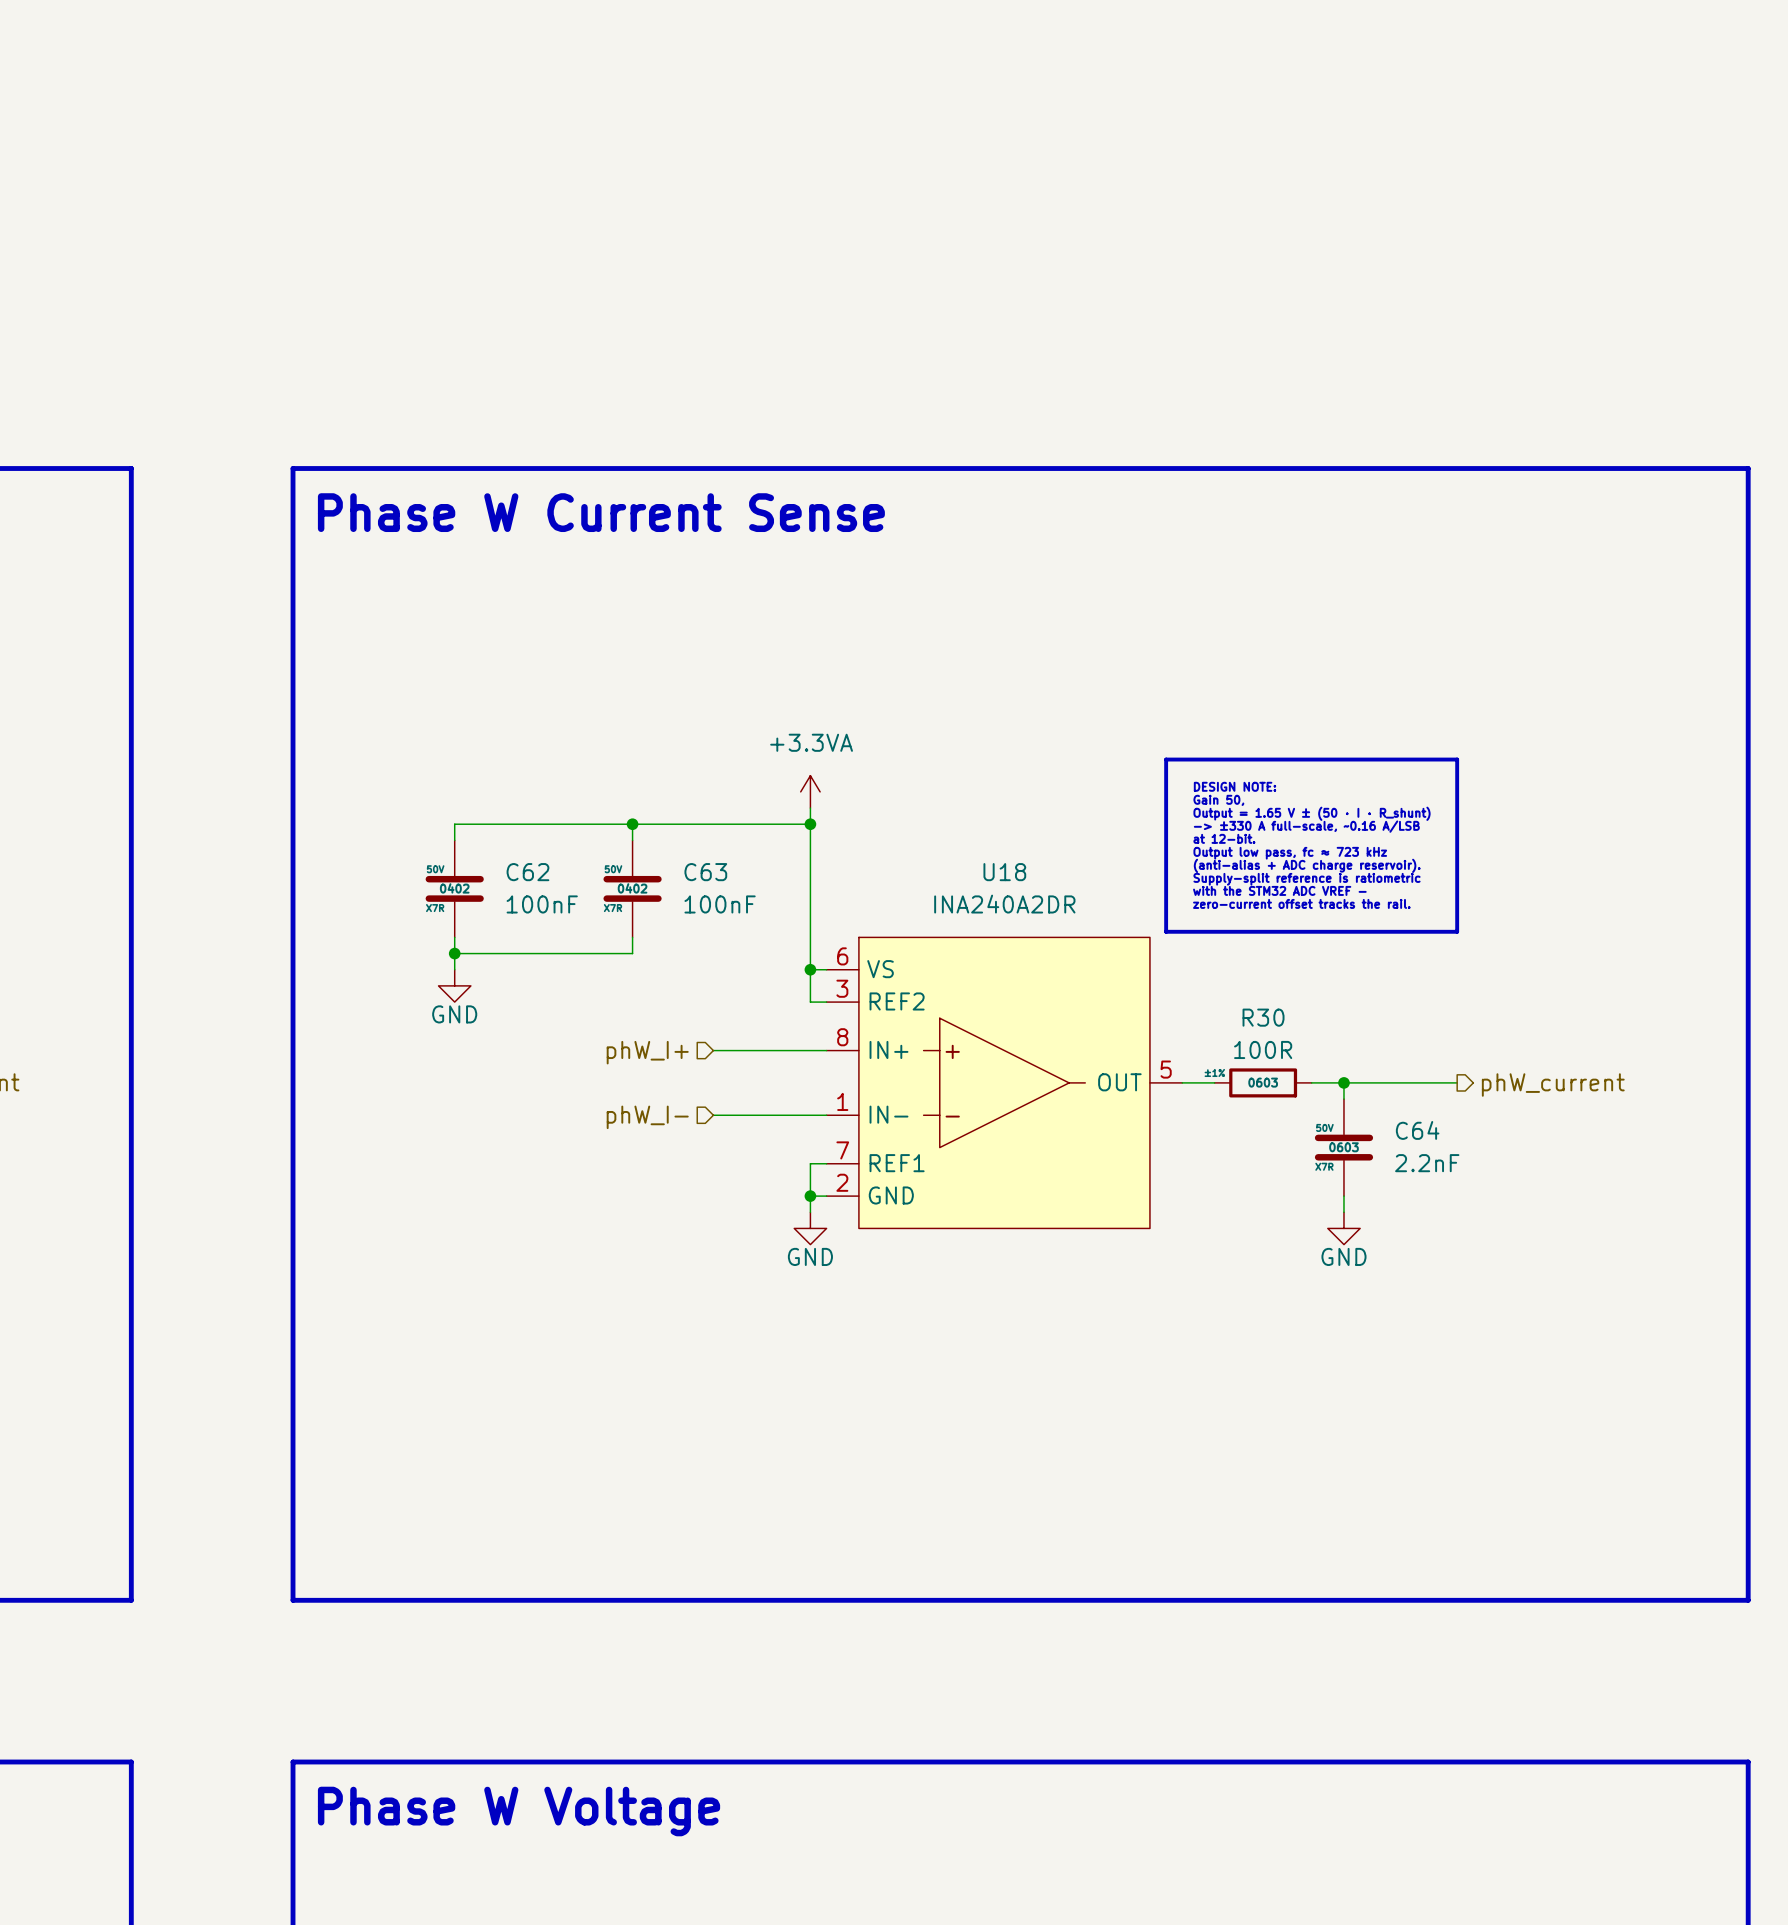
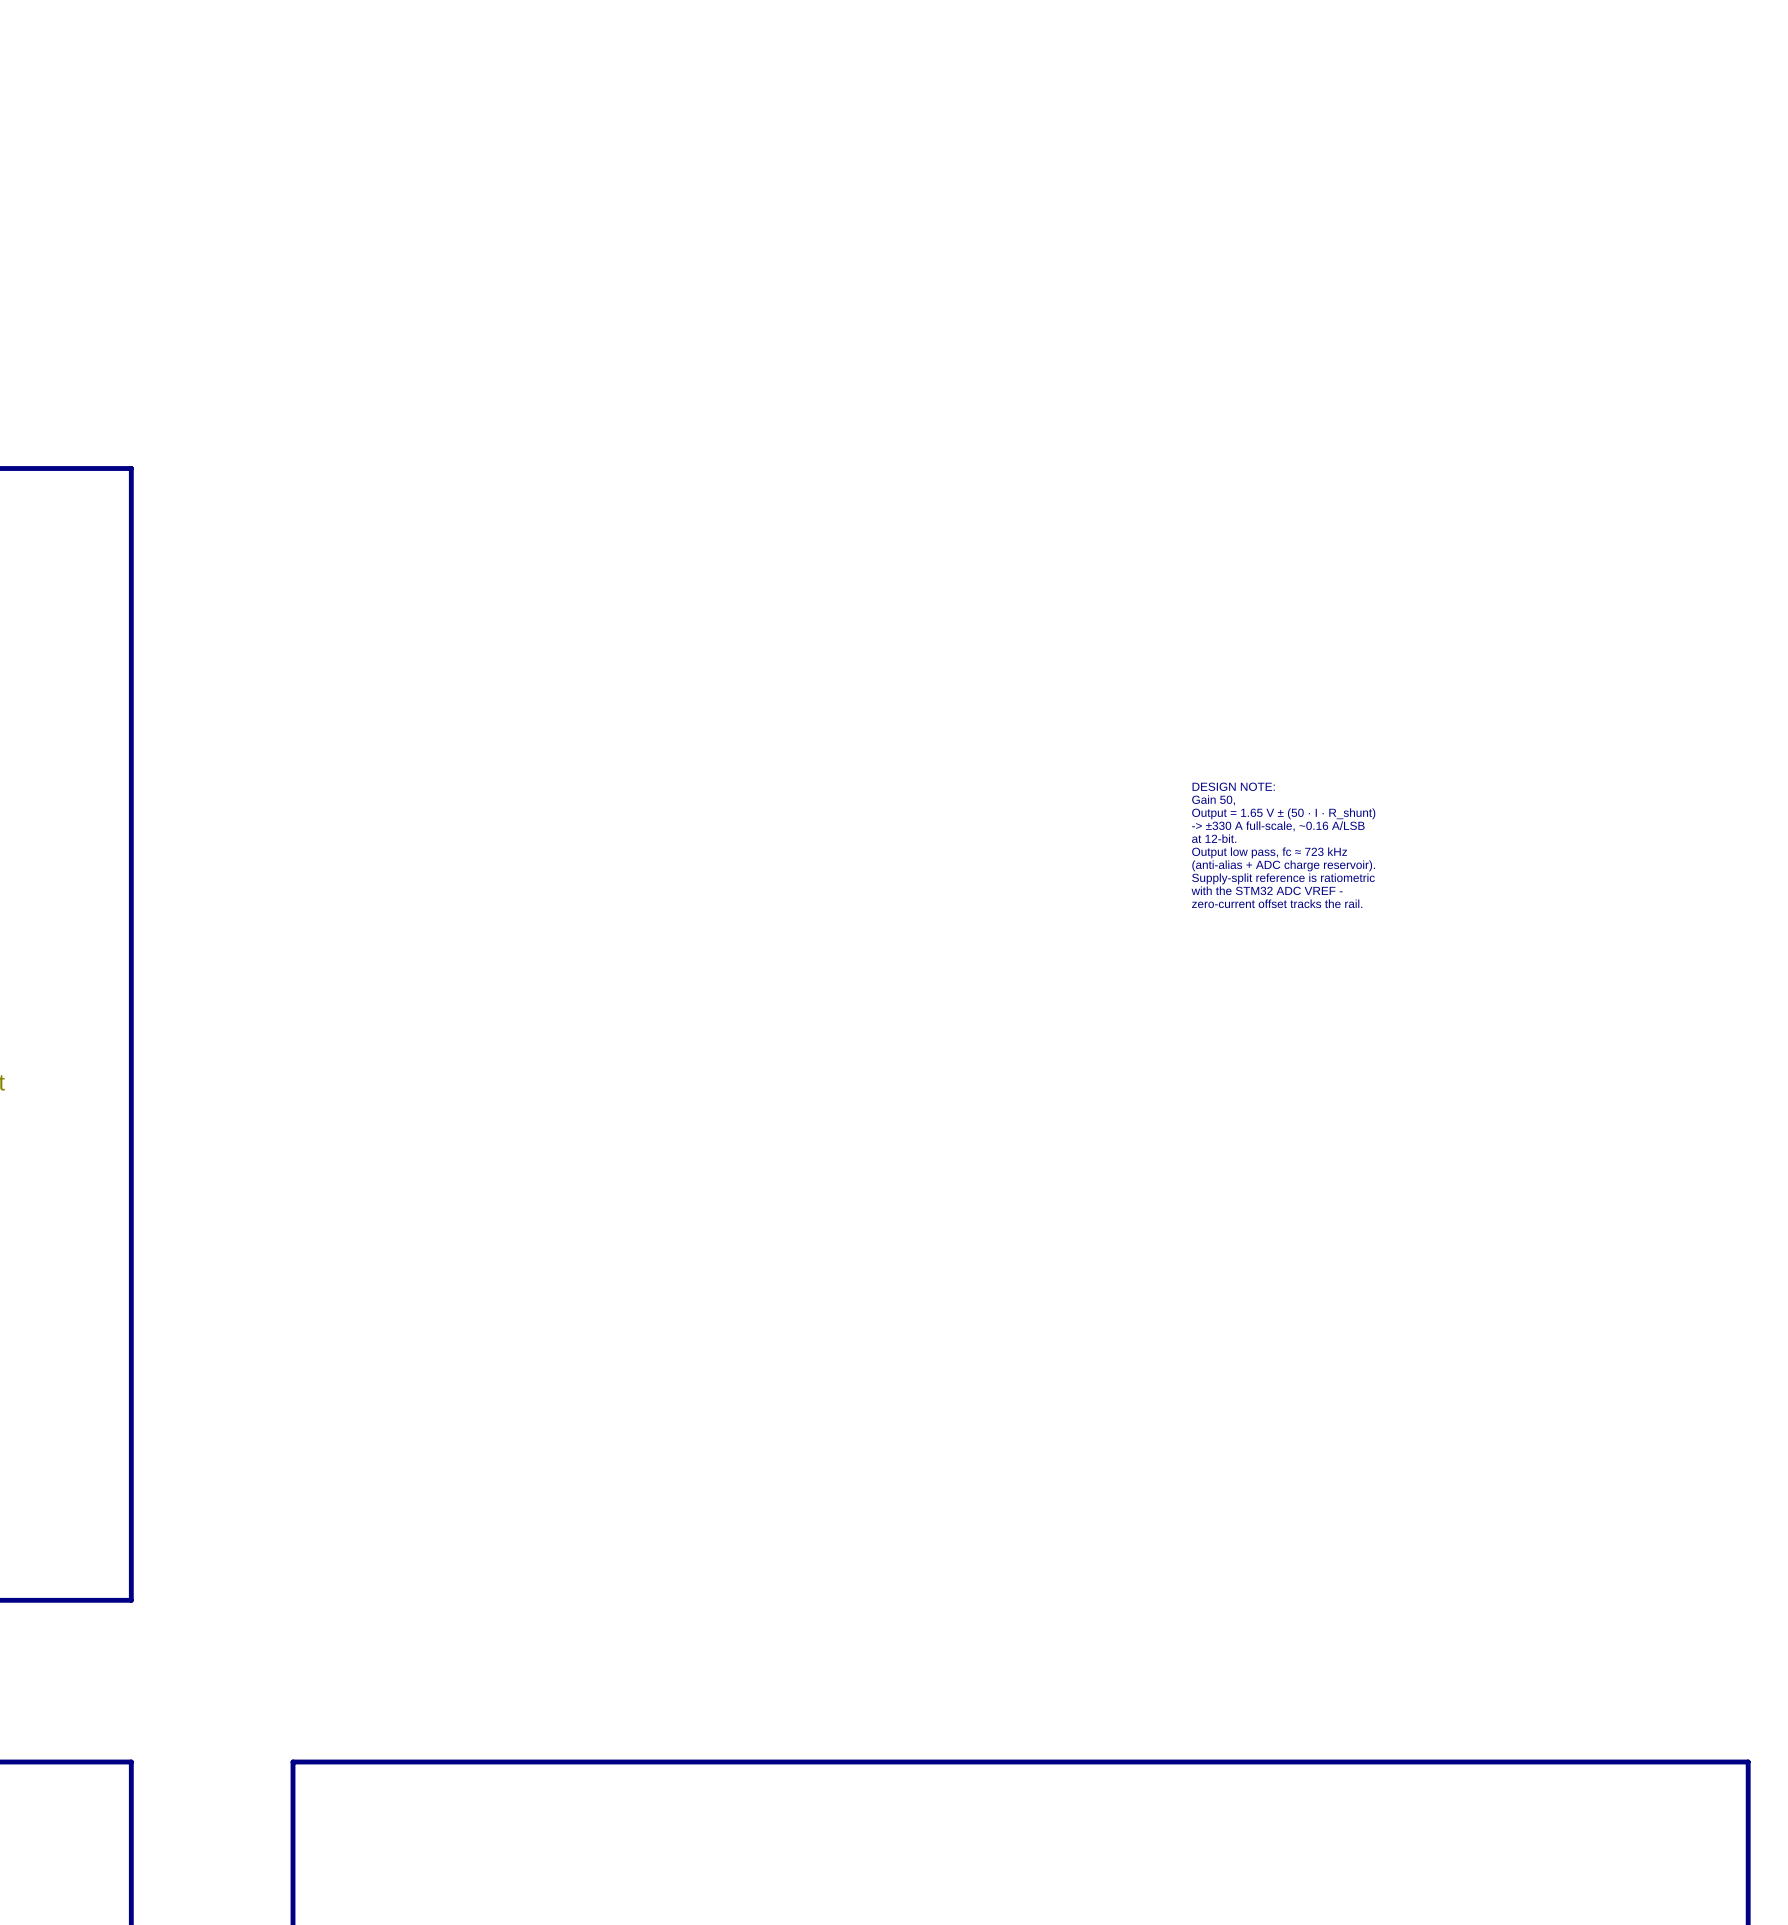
line: (293, 468) (1748, 468) (1748, 1600) (293, 1600) (293, 468) -> none
text: Phase W Current Sense (601, 512) -> none
line: (1166, 759) (1457, 759) (1457, 931) (1166, 931) (1166, 759) -> none
power symbol: +3.3VA (810, 791) -> none
wire: (810, 808) (810, 1002) (826, 1002) -> none
wire: (632, 824) (632, 840) -> none
junction: (632, 824) -> none
wire: (810, 824) (454, 824) (454, 840) -> none
junction: (810, 824) -> none
C62: 100nF (454, 888) -> none
C63: 100nF (632, 888) -> none
wire: (454, 937) (454, 969) -> none
wire: (632, 937) (632, 953) (454, 953) -> none
junction: (454, 953) -> none
wire: (810, 969) (826, 969) -> none
junction: (810, 969) -> none
power symbol: GND (454, 985) -> none
wire: (713, 1050) (826, 1050) -> none
hierarchical label: phW_I+ (647, 1052) -> none
U18: INA240A2DR (1004, 1082) -> none
wire: (1182, 1082) (1214, 1082) -> none
R30: 100R (1263, 1082) -> none
wire: (1311, 1082) (1457, 1082) -> none
wire: (1343, 1082) (1343, 1099) -> none
junction: (1343, 1082) -> none
hierarchical label: phW_current (1553, 1085) -> none
wire: (713, 1115) (826, 1115) -> none
hierarchical label: phW_I- (647, 1117) -> none
C64: 2.2nF (1343, 1147) -> none
wire: (826, 1163) (810, 1163) (810, 1212) -> none
wire: (810, 1196) (826, 1196) -> none
junction: (810, 1196) -> none
wire: (1343, 1196) (1343, 1212) -> none
power symbol: GND (810, 1228) -> none
power symbol: GND (1343, 1228) -> none
text: Phase W Voltage (519, 1811) -> none

